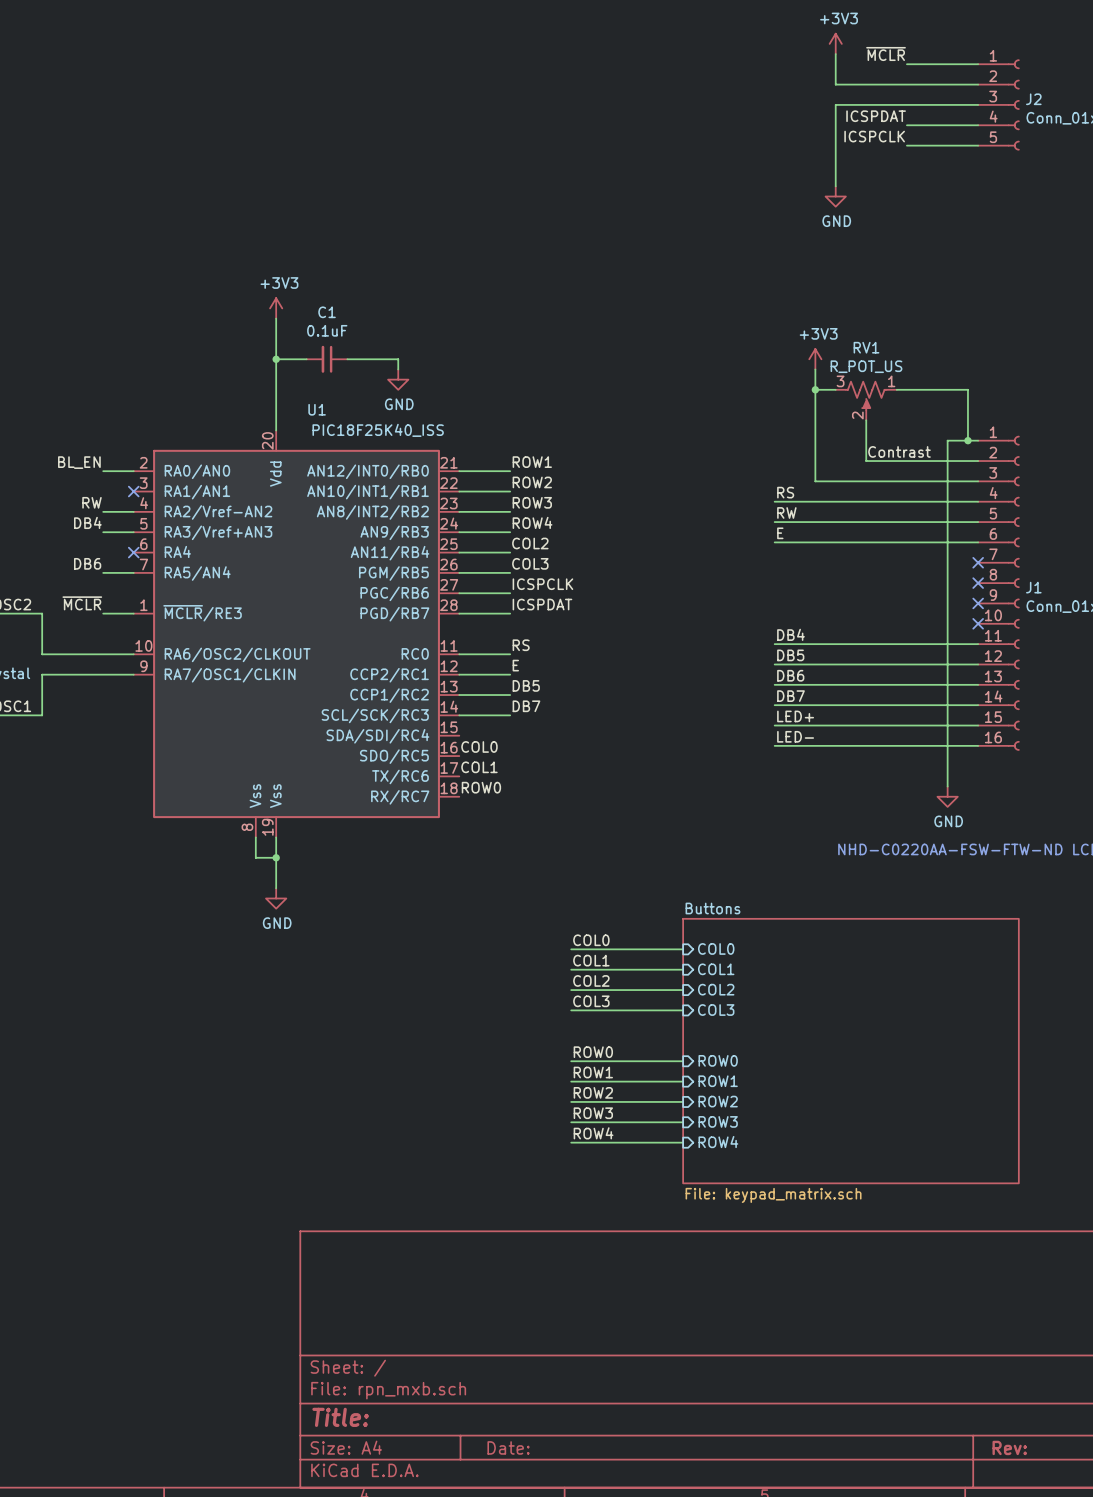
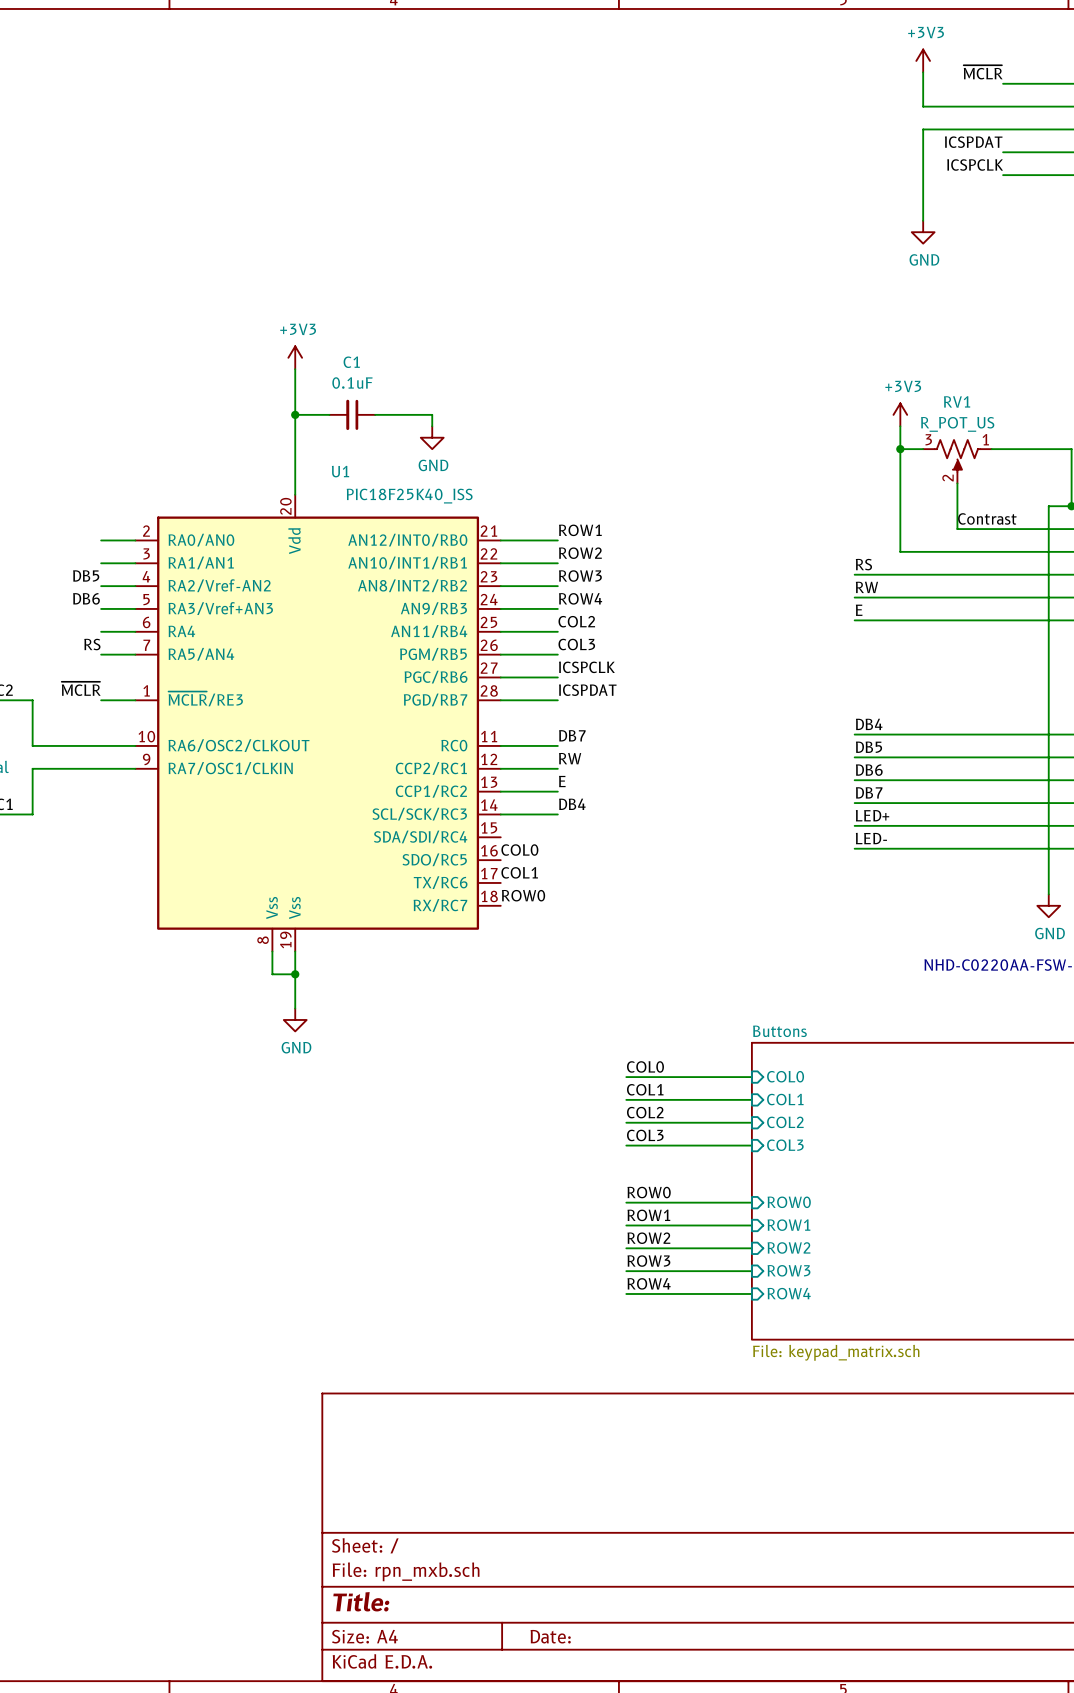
label: BL_EN (79, 462) -> none
wire: none -> (101, 563) (135, 563)
no-connect mark: (133, 491) -> none
label: RW (92, 502) -> DB5 (86, 575)
label: DB4 (87, 522) -> DB6 (86, 598)
wire: none -> (101, 631) (135, 631)
no-connect mark: (133, 552) -> none
label: DB6 (87, 563) -> RS (92, 644)
label: RS (521, 645) -> DB7 (572, 735)
label: E (515, 665) -> RW (570, 758)
label: DB5 (526, 685) -> E (562, 781)
label: DB7 (526, 706) -> DB4 (572, 804)

